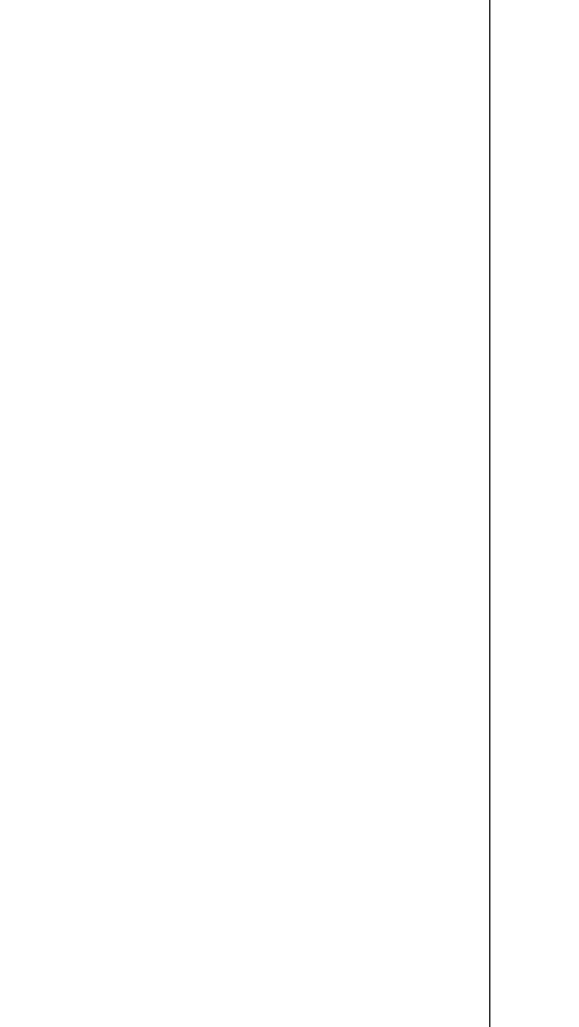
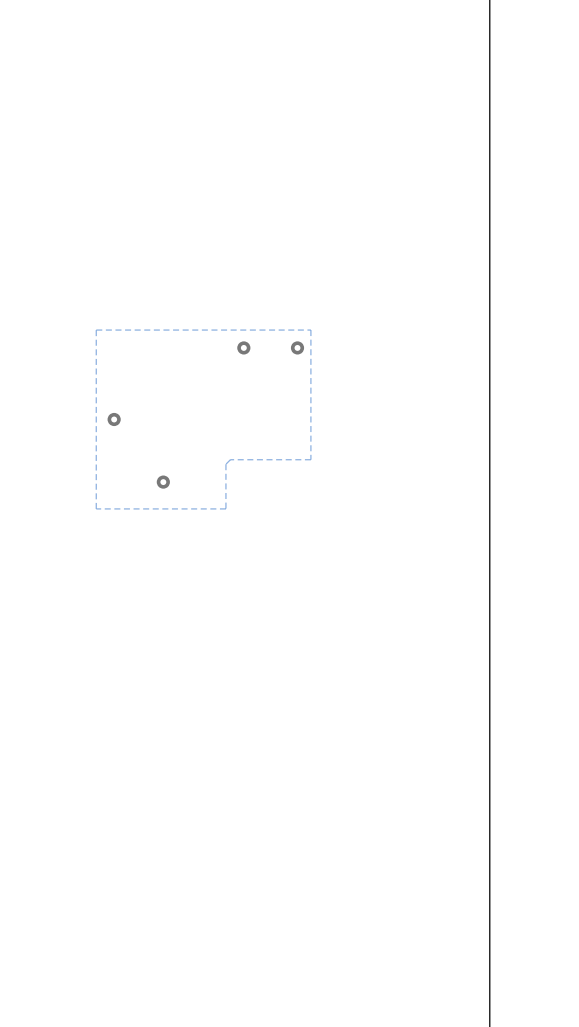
zone outline: none -> (310, 330) (96, 330) (96, 508) (225, 508) (225, 464) (230, 459) (310, 459) (310, 330)
via: none -> (243, 347)
via: none -> (297, 347)
via: none -> (114, 419)
via: none -> (163, 482)

